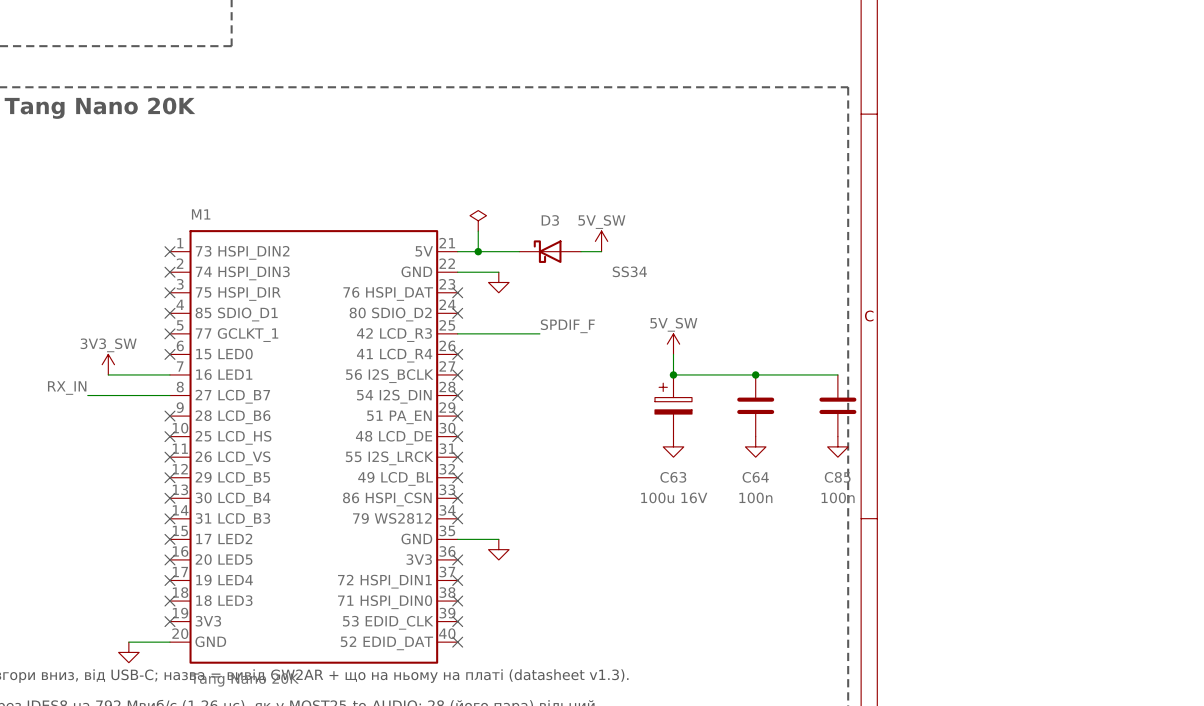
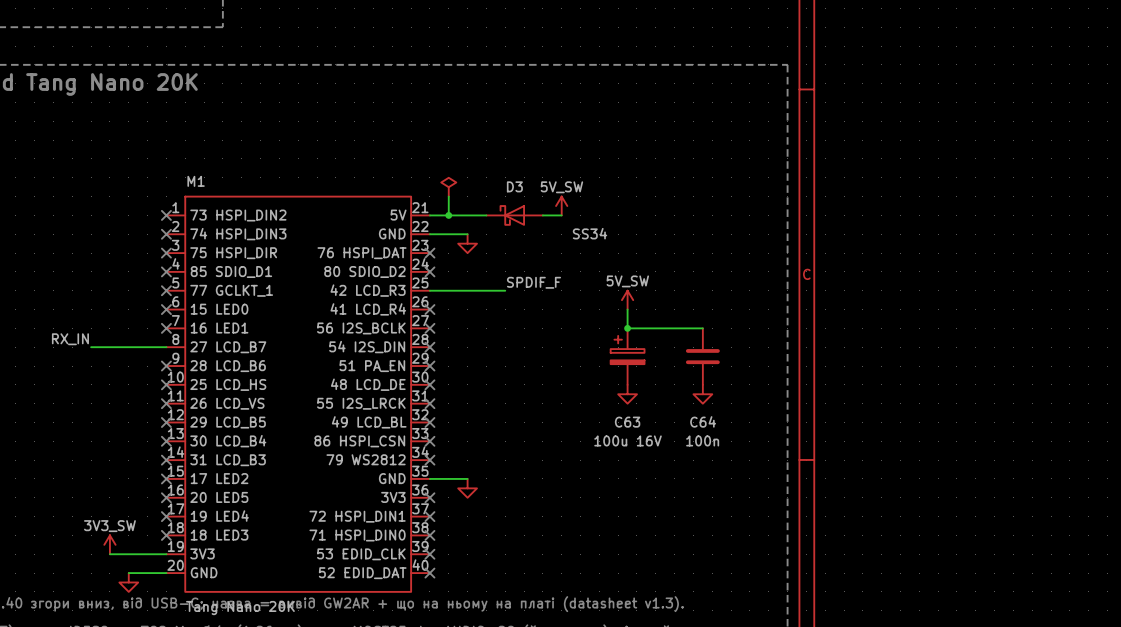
power symbol: 3V3_SW (108, 364) -> none
wire: (108, 374) (169, 374) -> none
no-connect mark: none -> (166, 328)
wire: (755, 374) (837, 374) -> none
junction: (755, 374) -> none
C85: 100n (837, 405) -> none
power symbol: (837, 446) -> none
power symbol: none -> 3V3_SW (109, 544)
wire: none -> (109, 554) (166, 554)
no-connect mark: (169, 621) -> none

